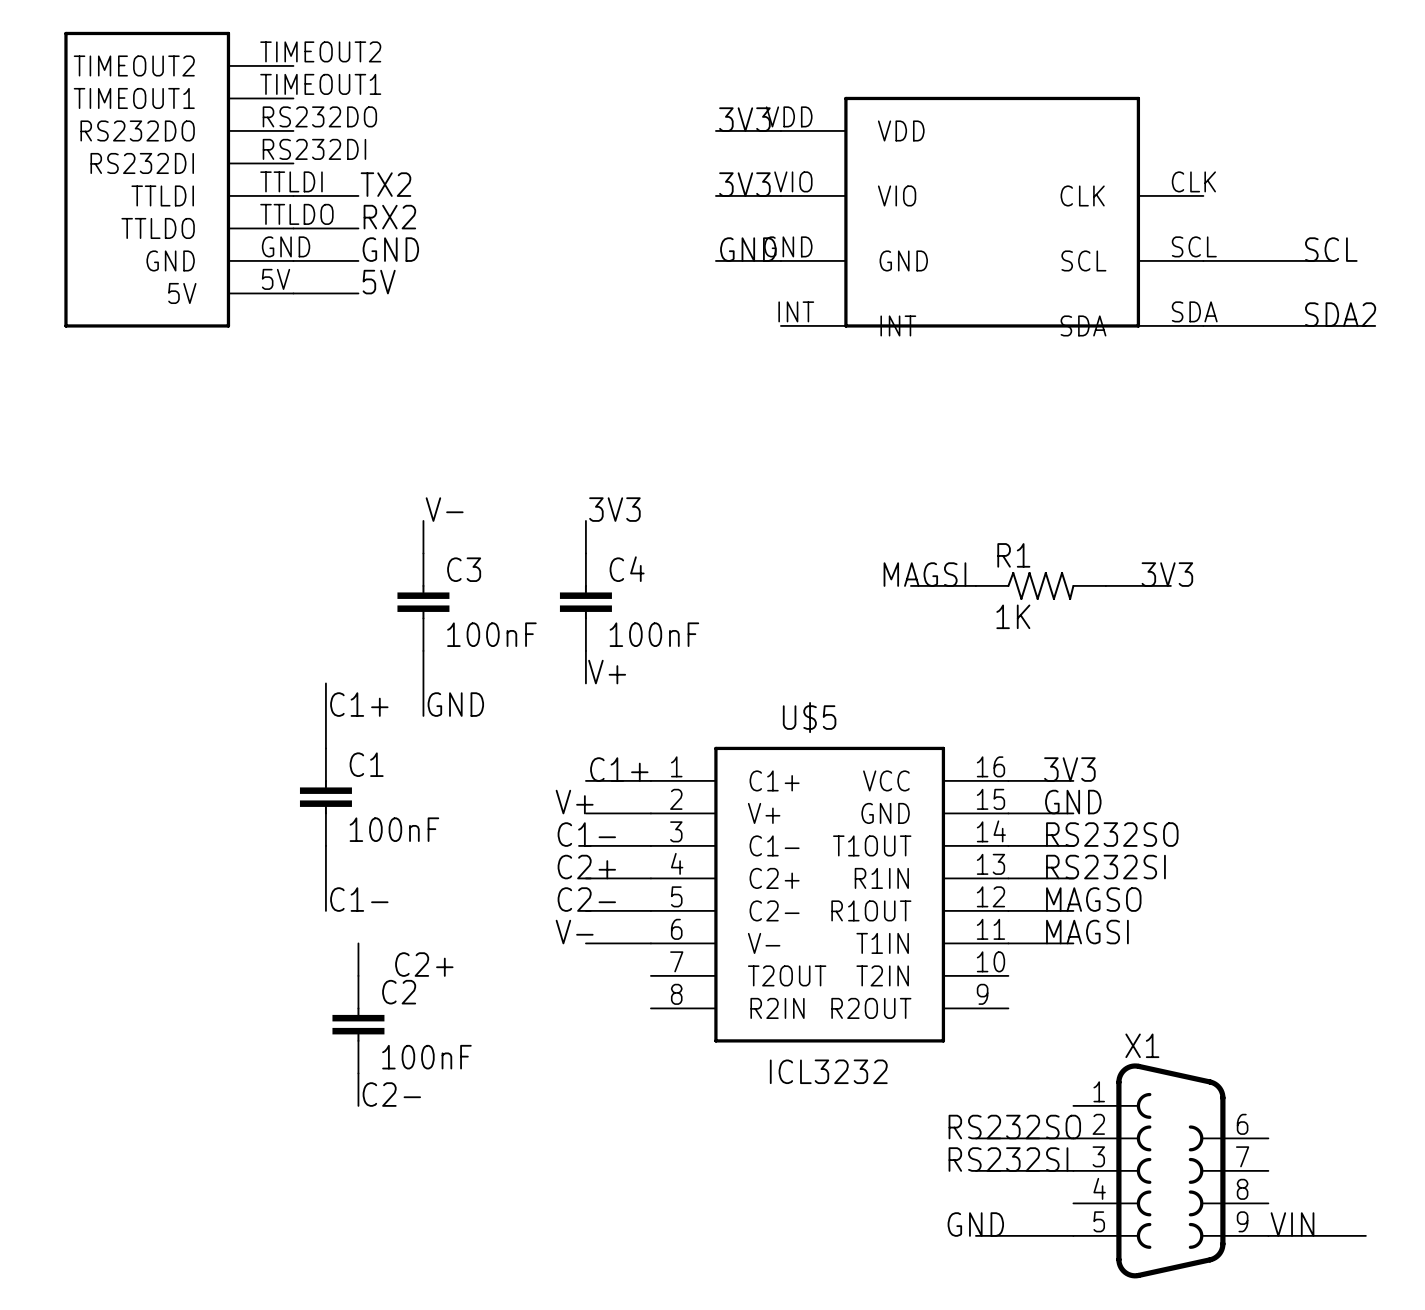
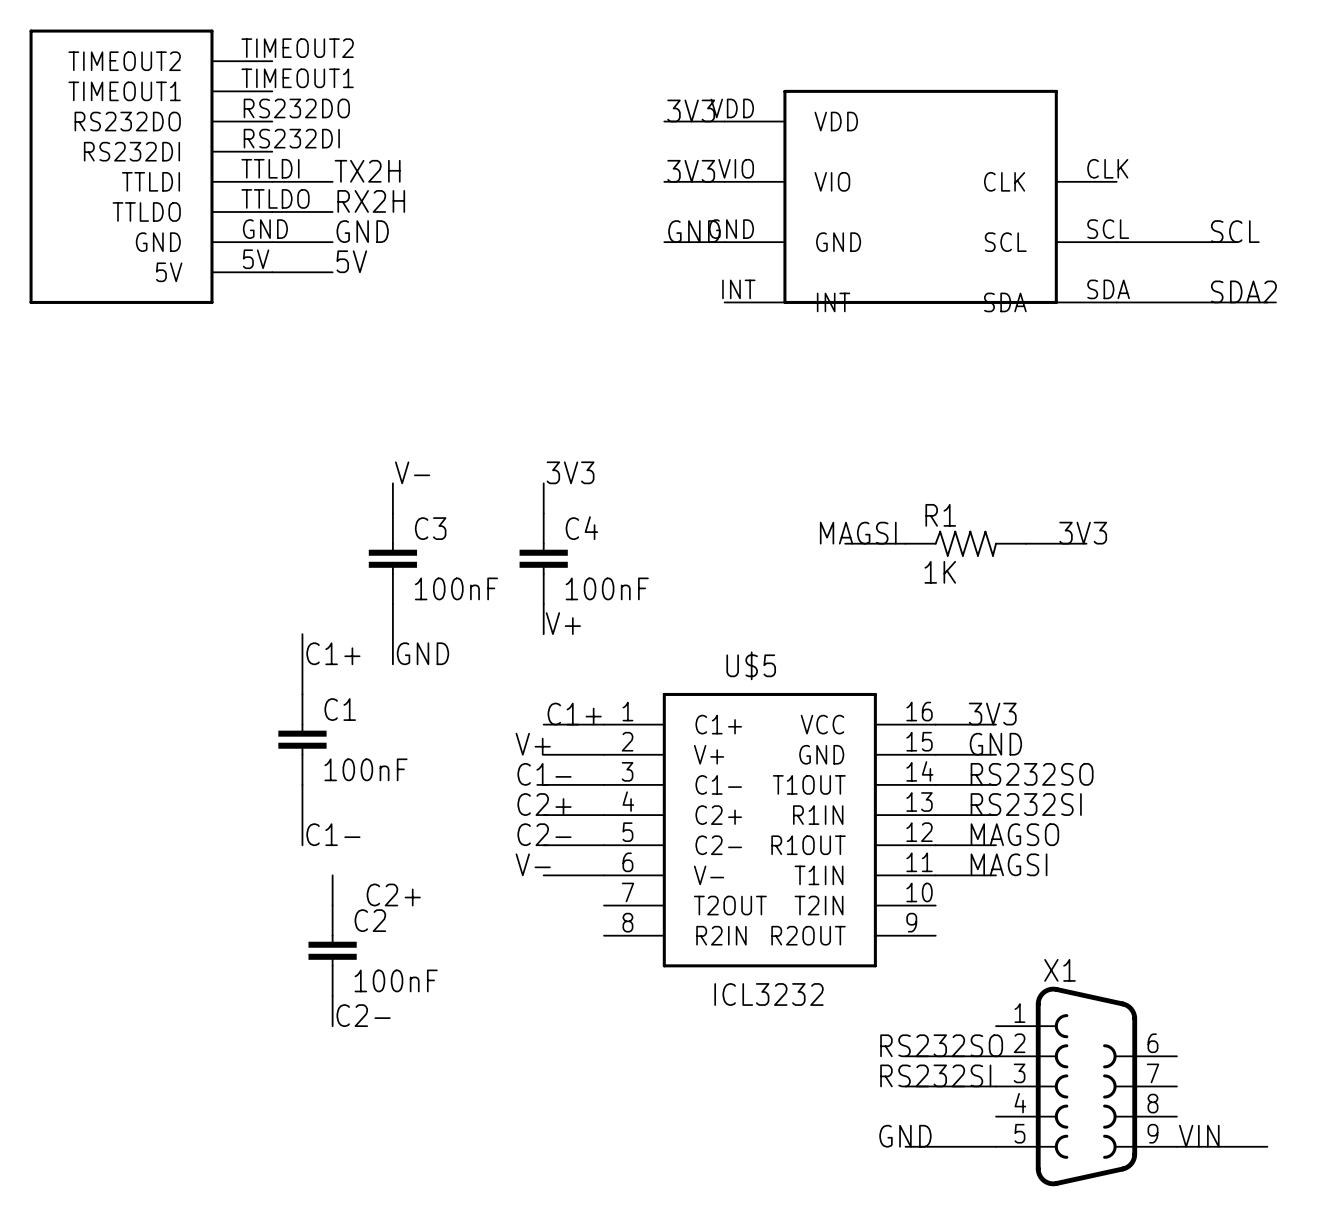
part: none -> (150, 166)
part: (178, 179) -> none
label: TX2 (385, 184) -> TX2H (367, 171)
label: RX2 (389, 217) -> RX2H (371, 201)

